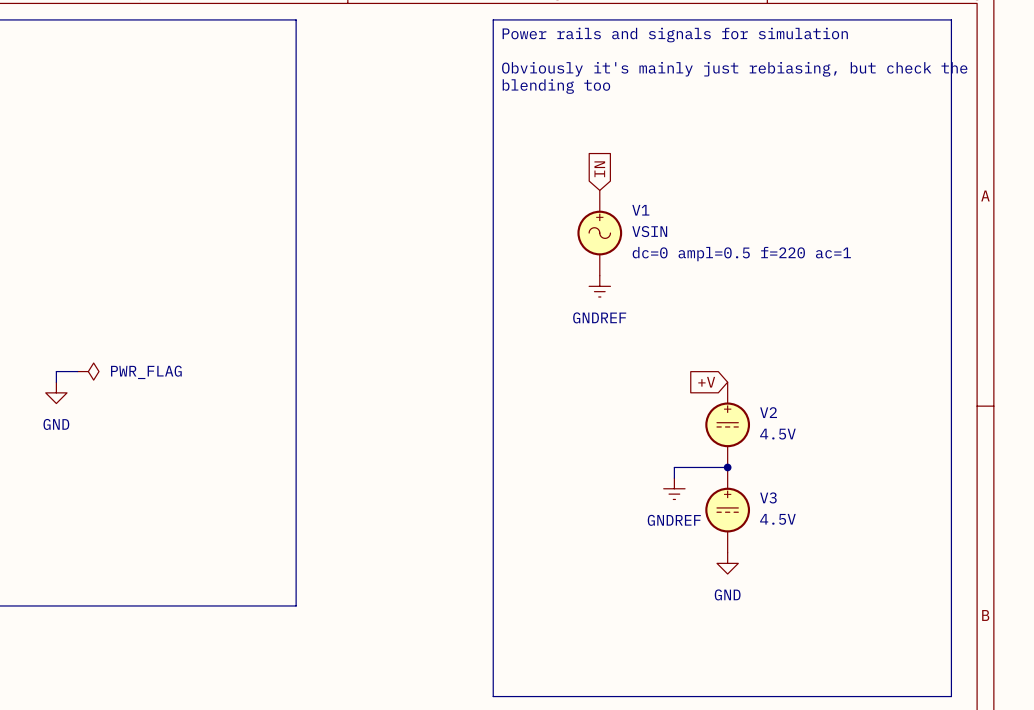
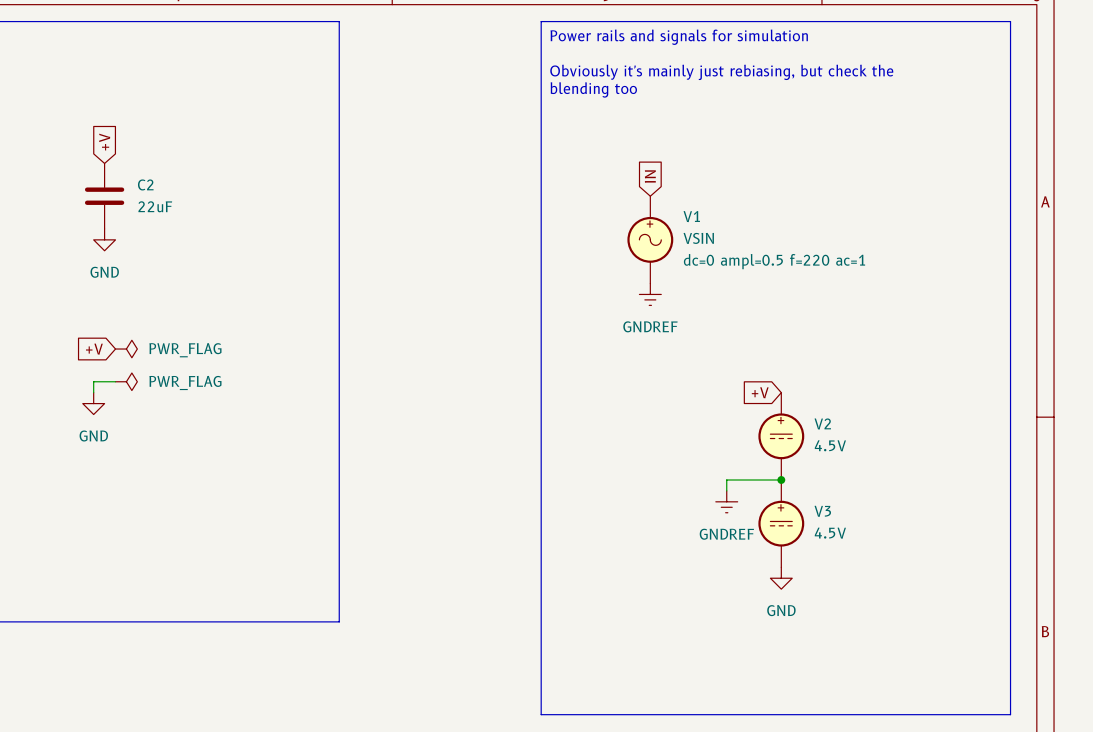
global label: none -> +V (104, 142)
C2: none -> 22uF (104, 196)
power symbol: none -> GND (104, 239)
global label: none -> +V (94, 349)
power symbol: none -> PWR_FLAG (126, 349)

